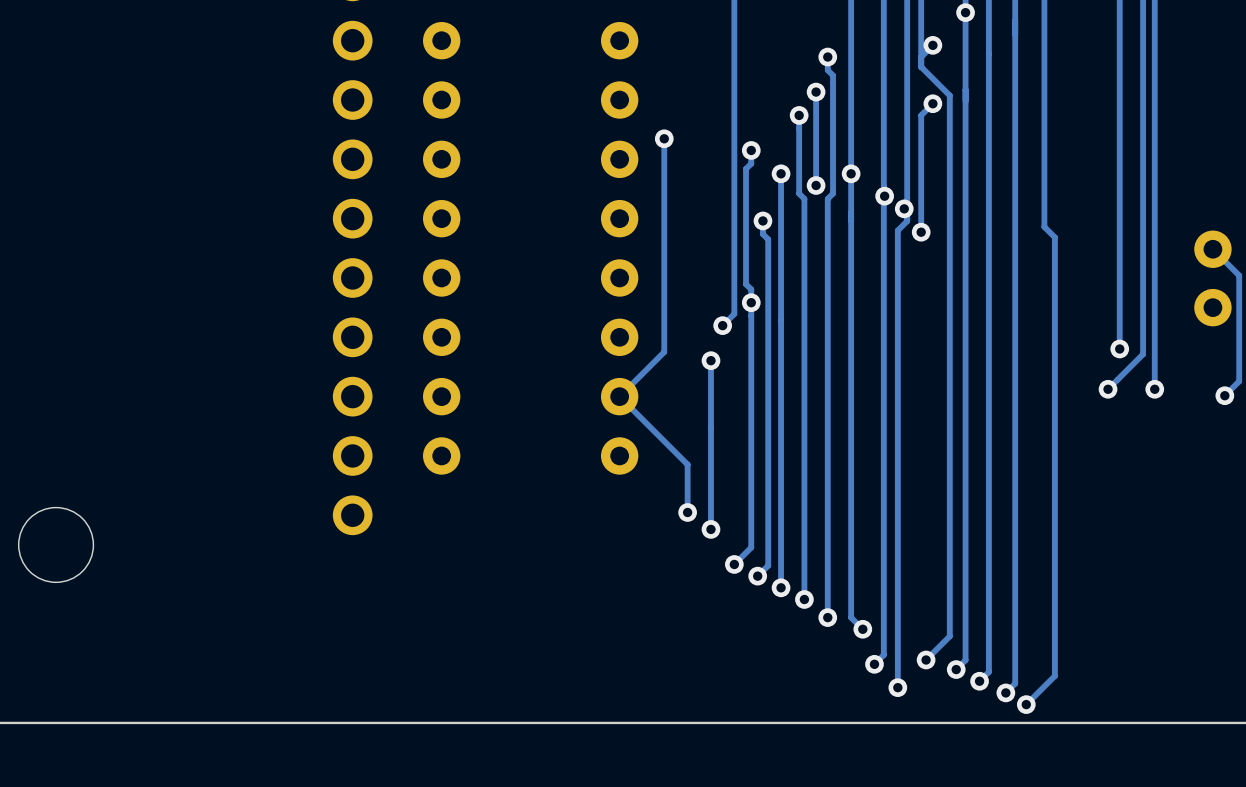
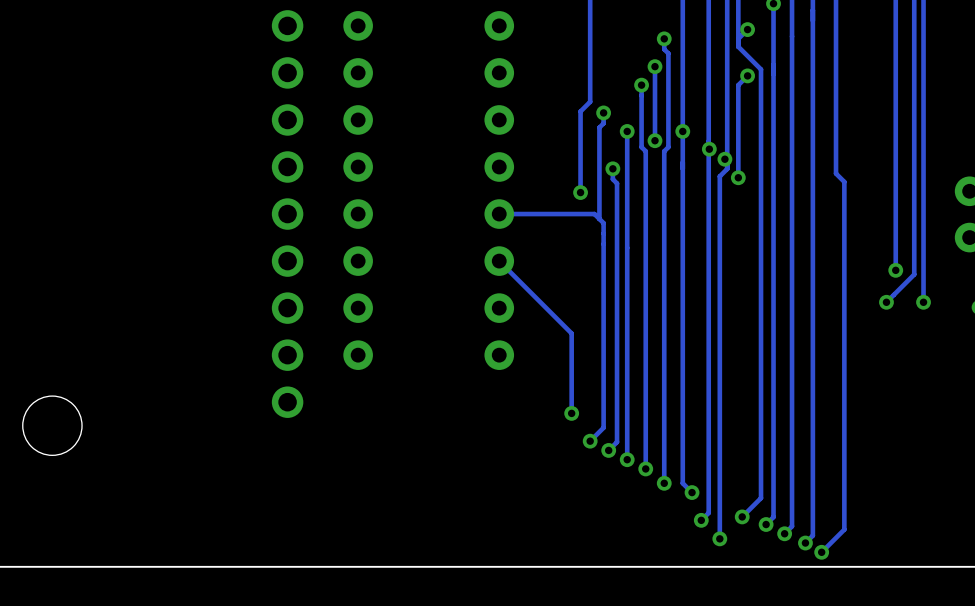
track: (734, 136) (734, 313) (722, 325) -> (590, 101) (580, 111) (580, 192)
track: (664, 138) (664, 352) (619, 396) (687, 464) (687, 512) -> none
via: (664, 138) -> none
via: none -> (580, 192)
track: none -> (499, 214) (594, 214) (599, 218)
via: (751, 302) -> none
via: (722, 325) -> none
track: (710, 360) (710, 428) -> (499, 261) (571, 333)
via: (710, 360) -> none
via: (687, 512) -> none

